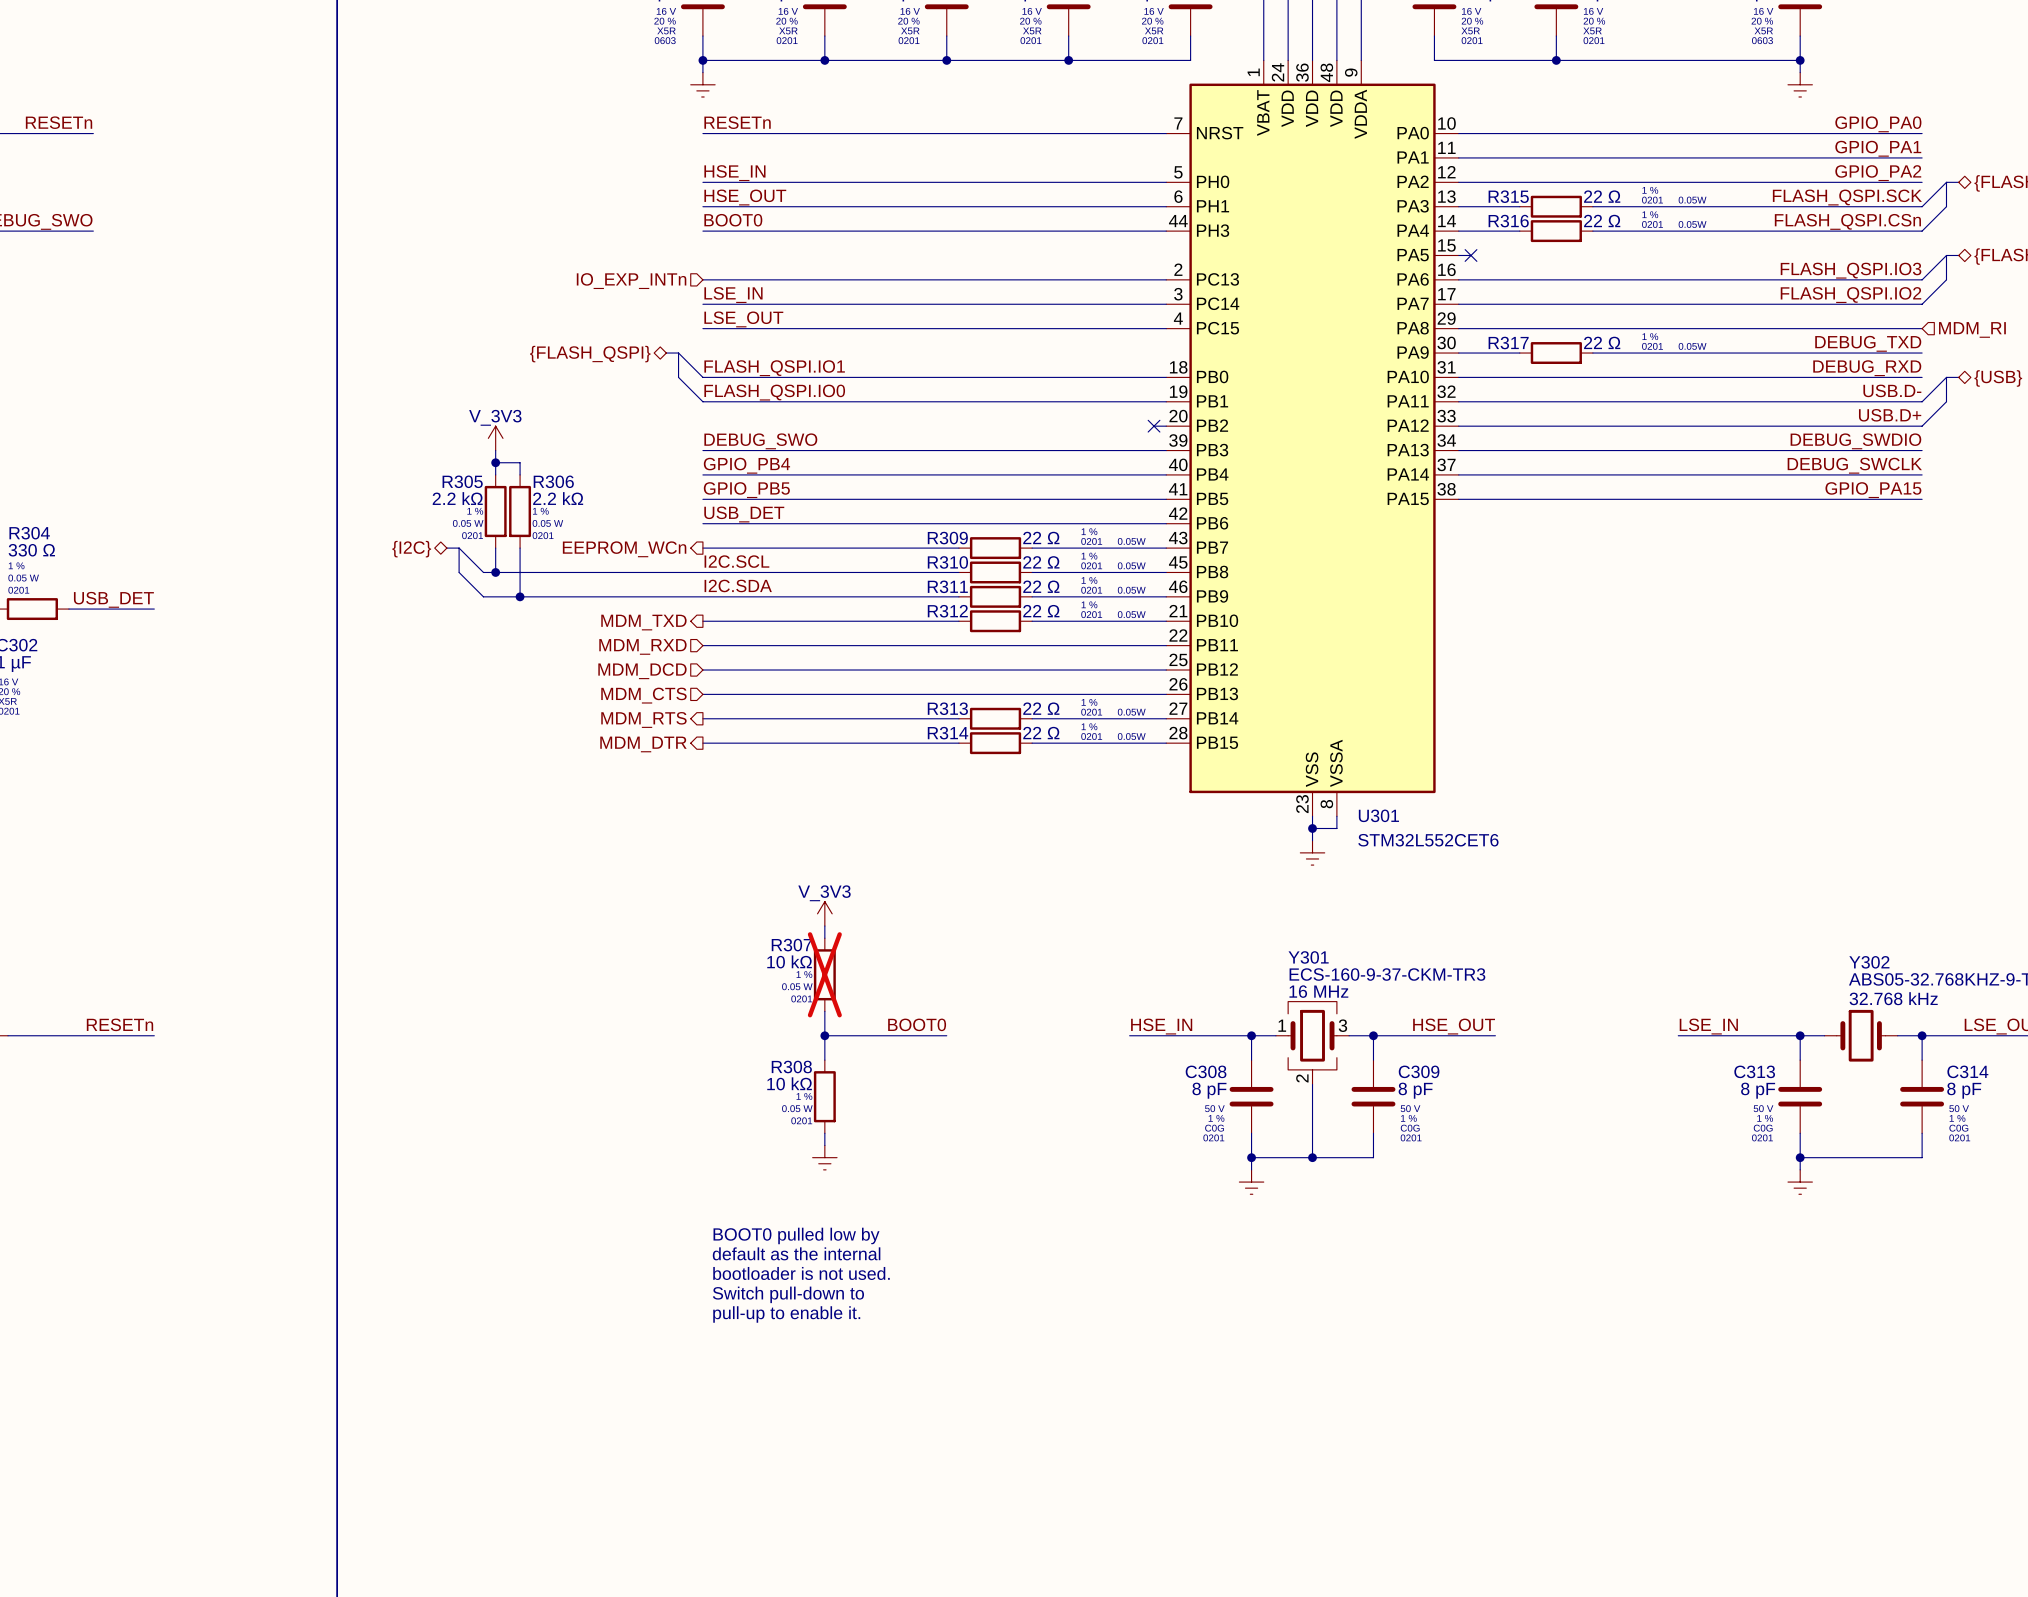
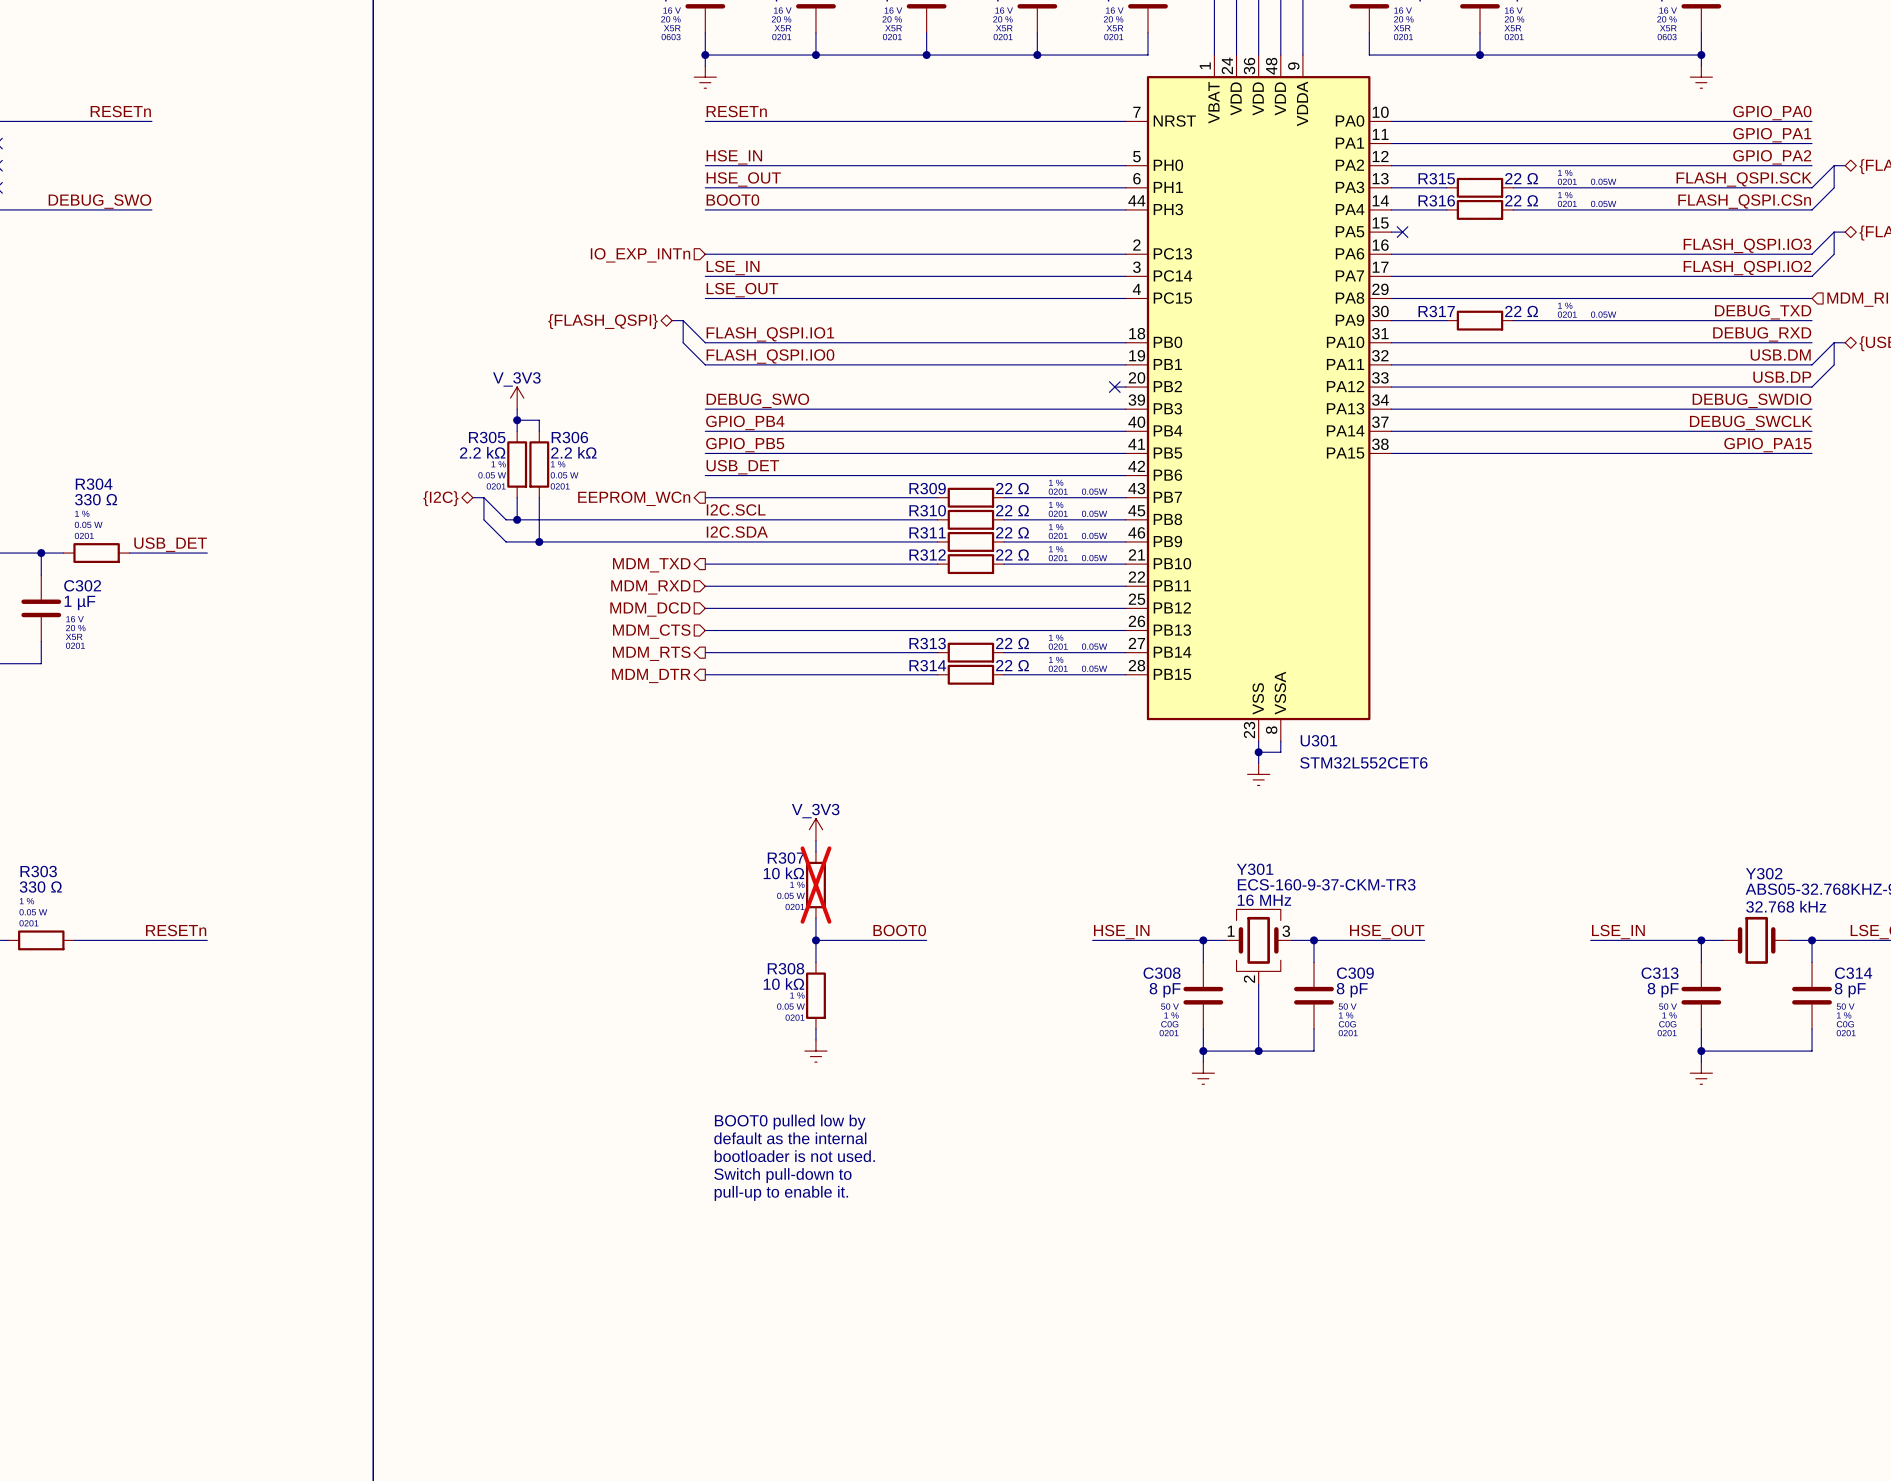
label: USB.D- (1892, 390) -> USB.DM (1780, 355)
label: USB.D+ (1890, 415) -> USB.DP (1782, 377)

